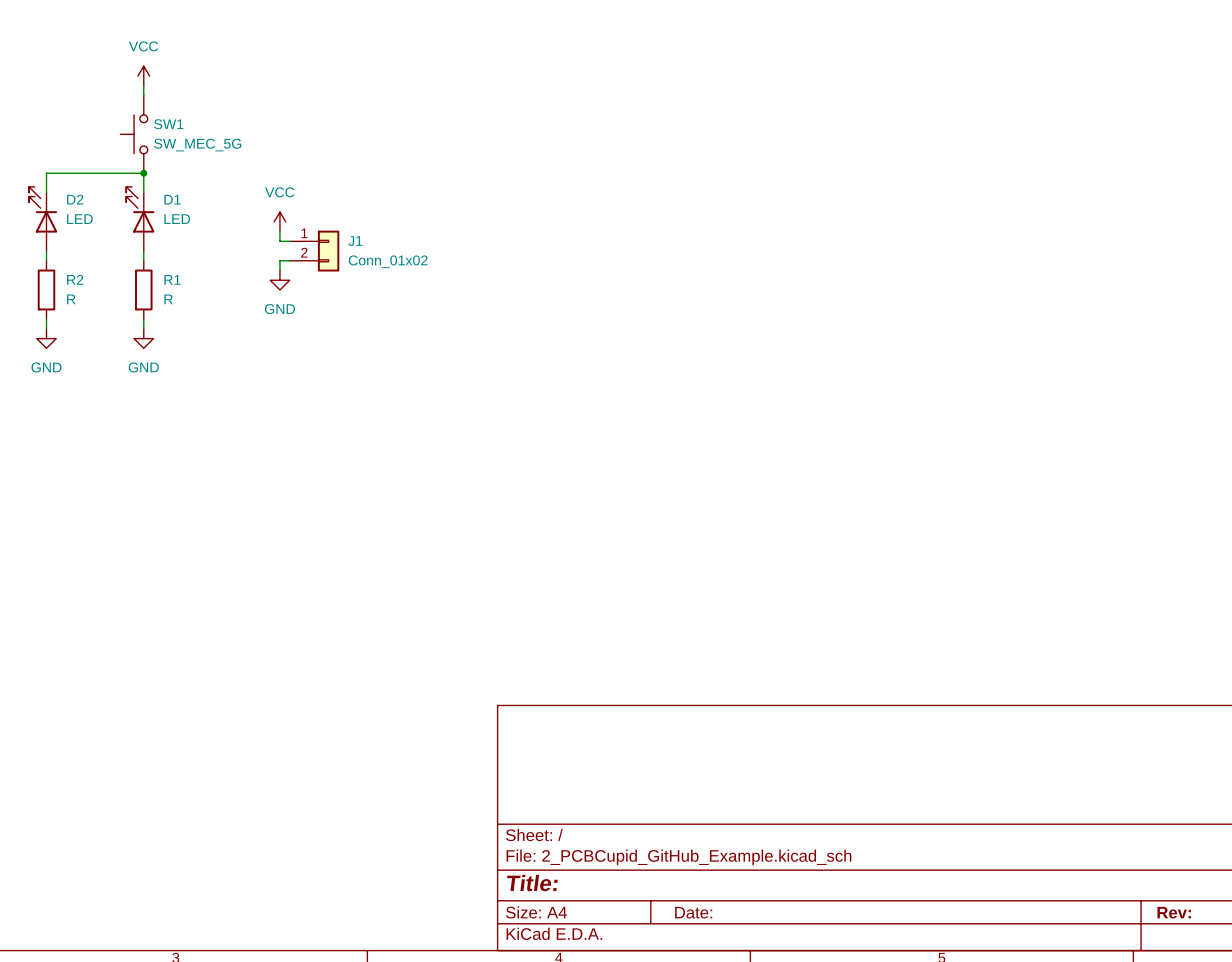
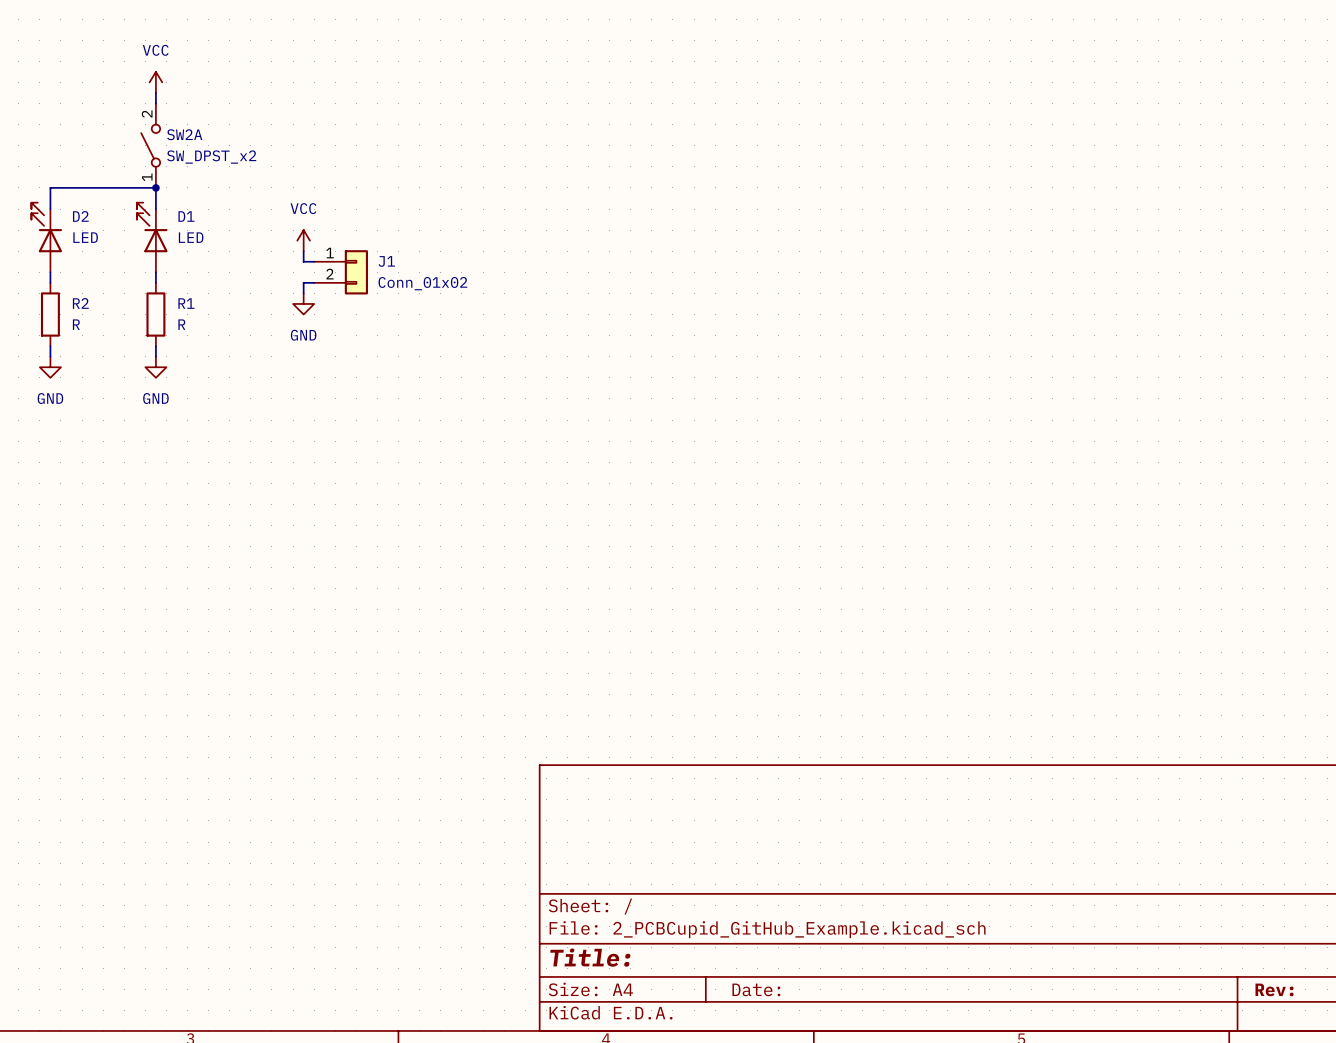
SW1: SW_MEC_5G (134, 134) -> none
SW2A: none -> SW_DPST_x2 (150, 145)

